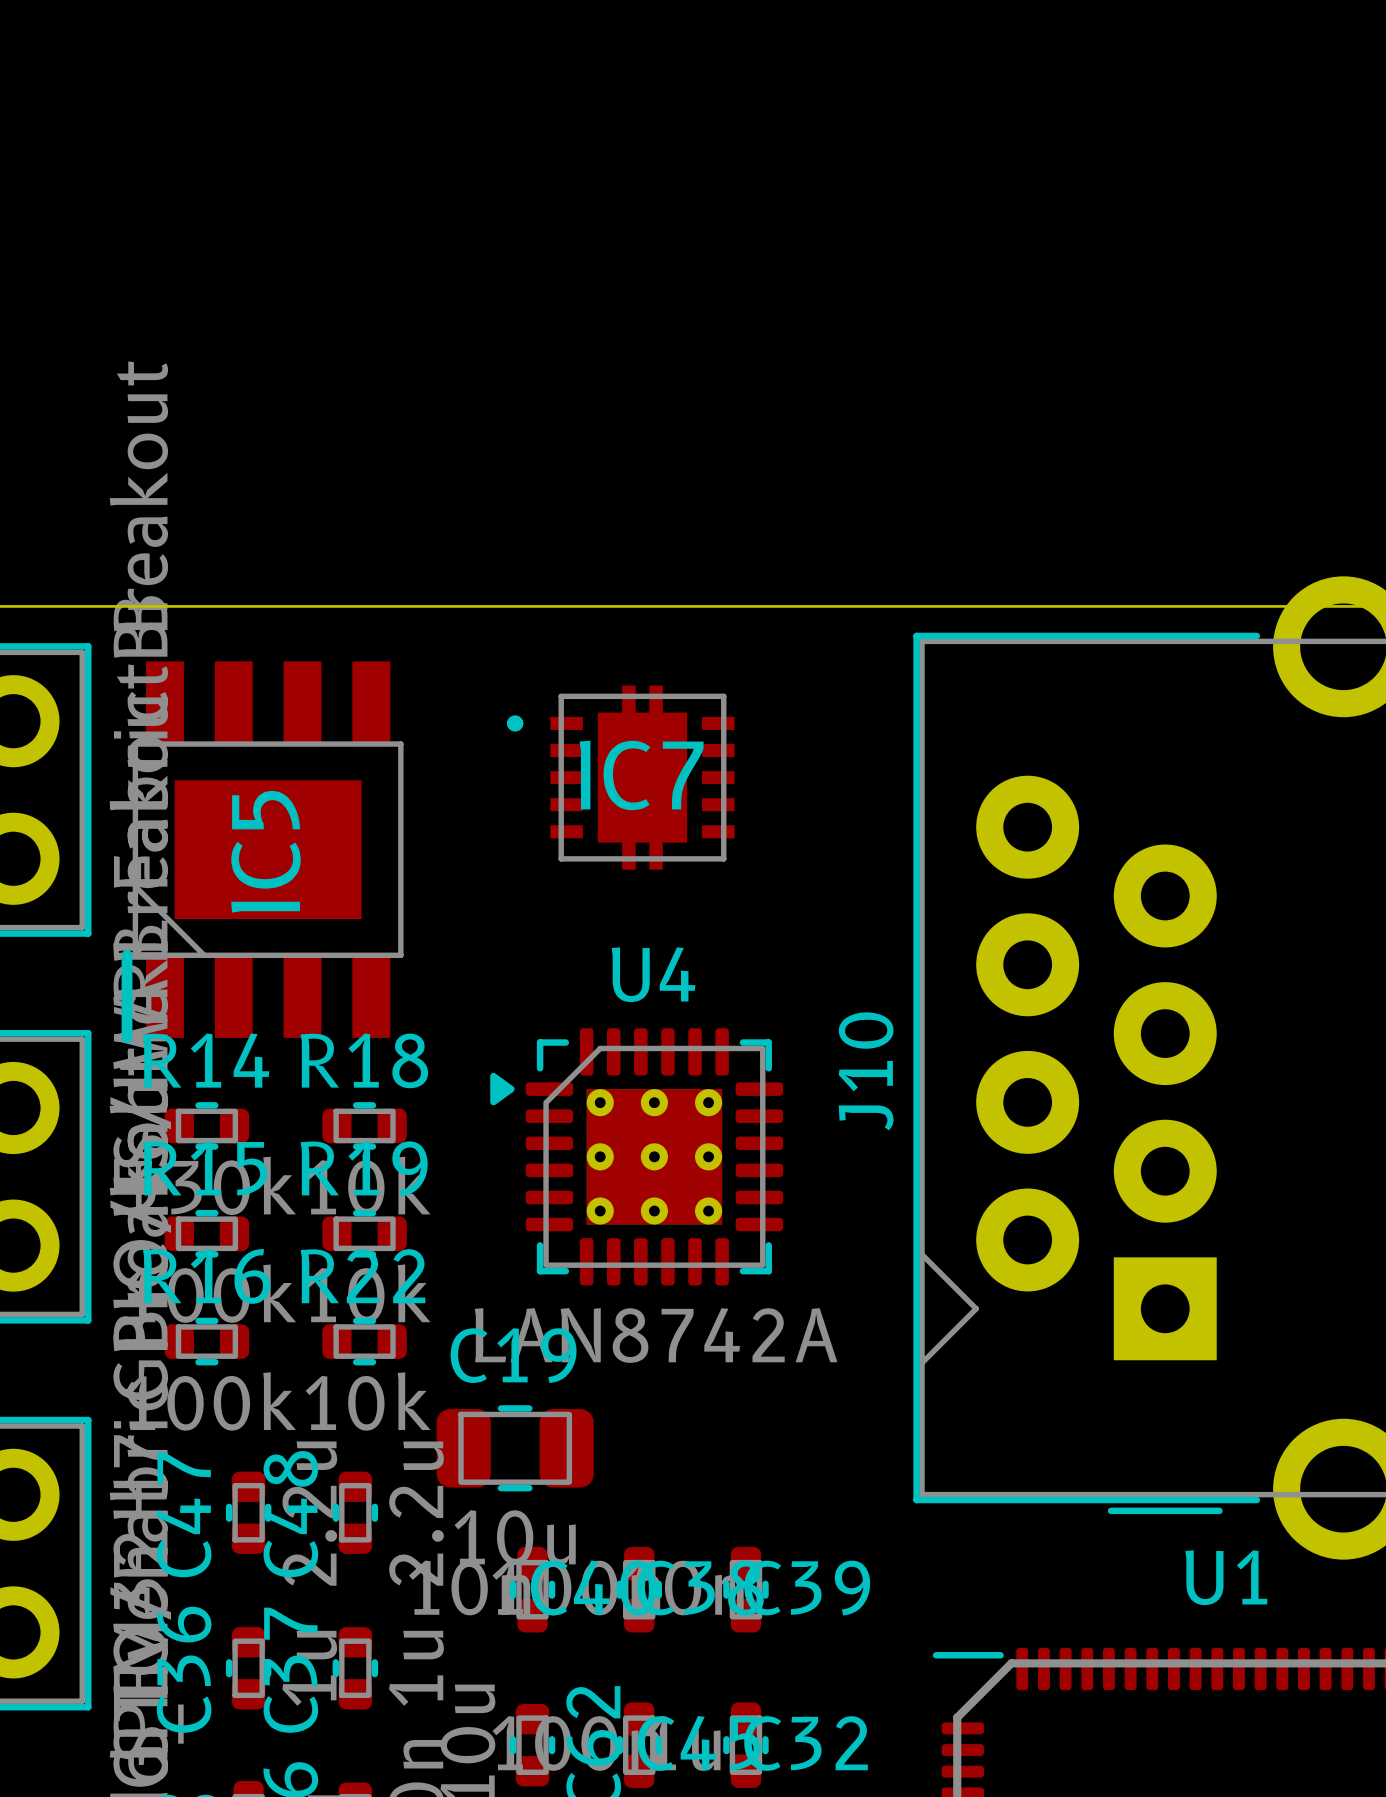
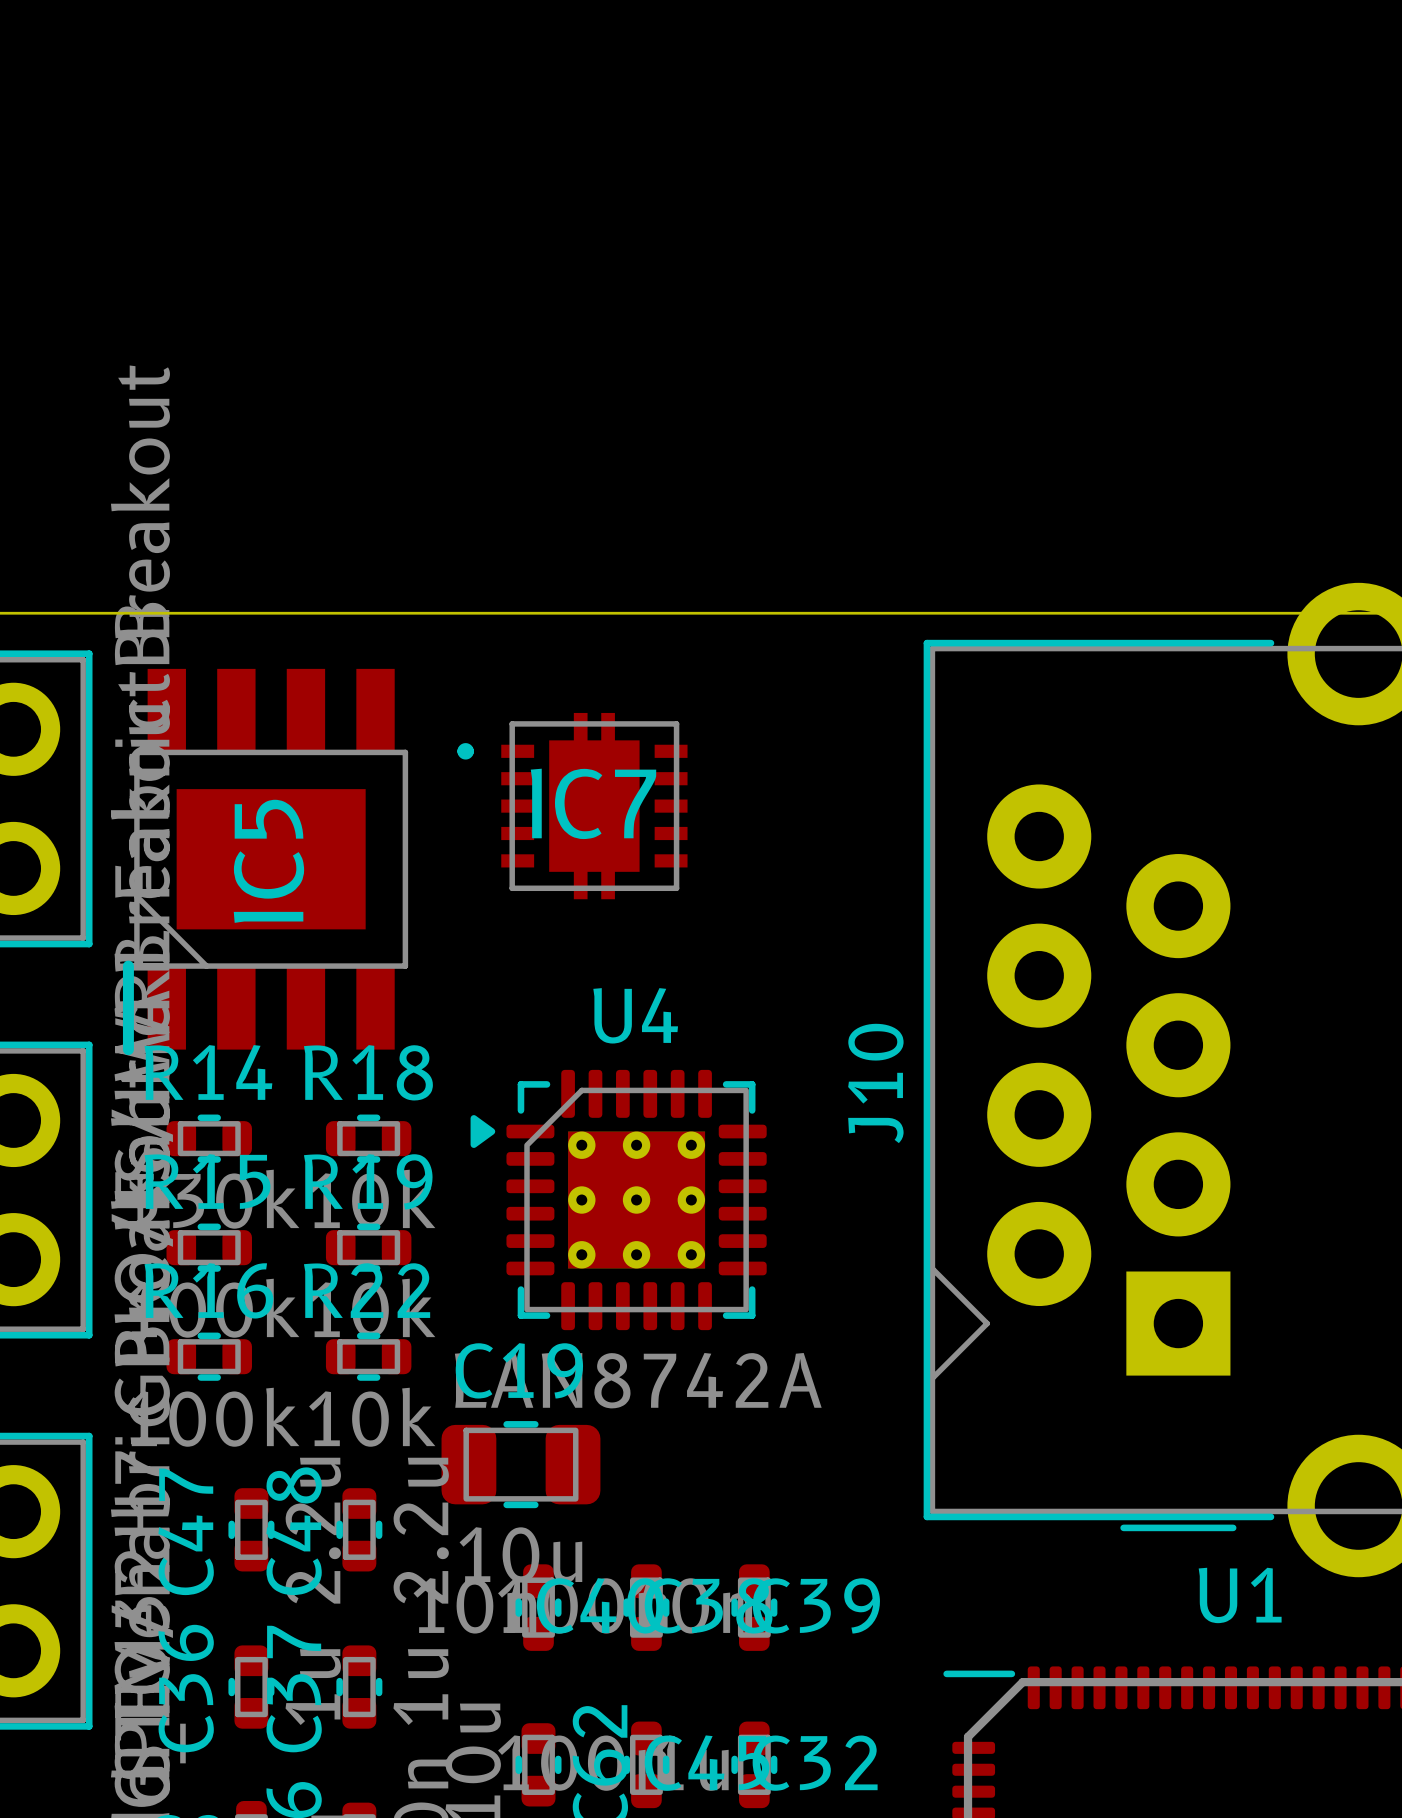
IC7 position: (620, 777) -> (572, 806)
U4 position: (636, 1156) -> (618, 1200)

